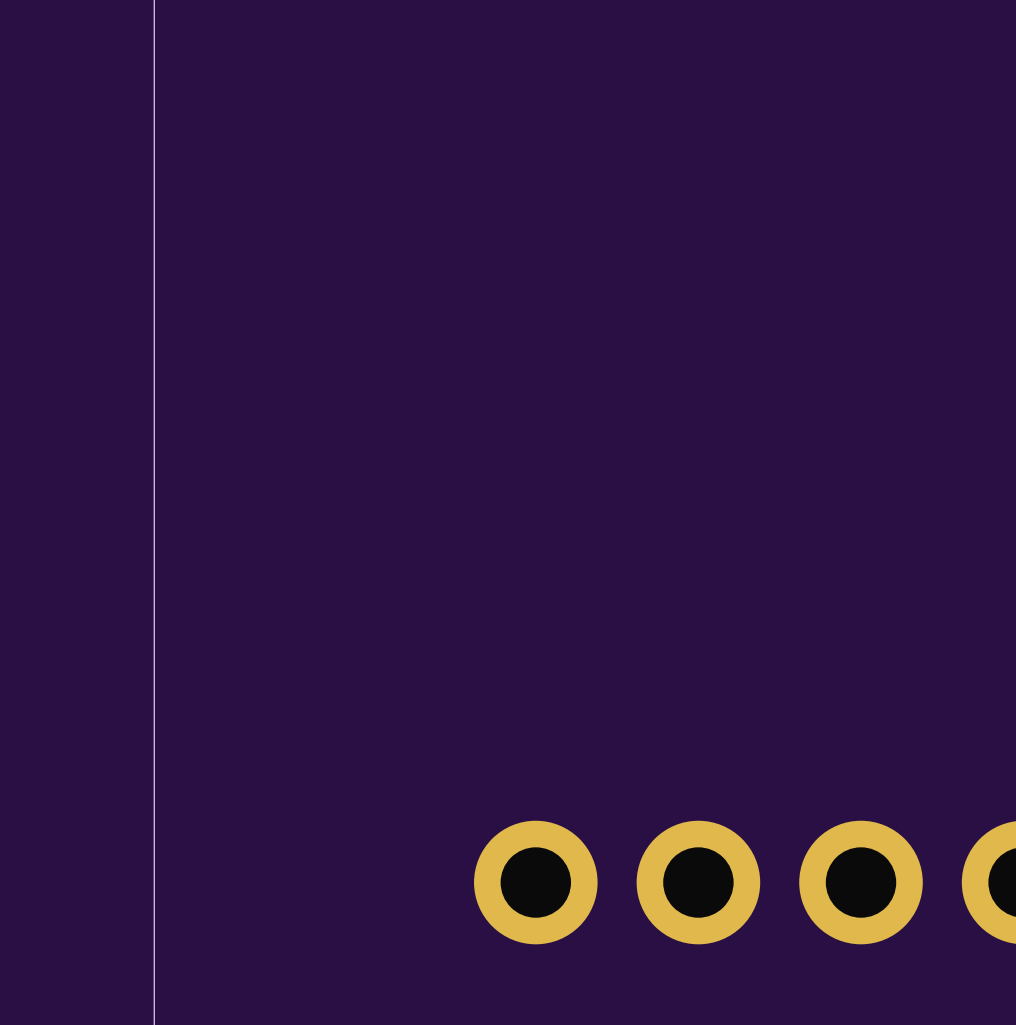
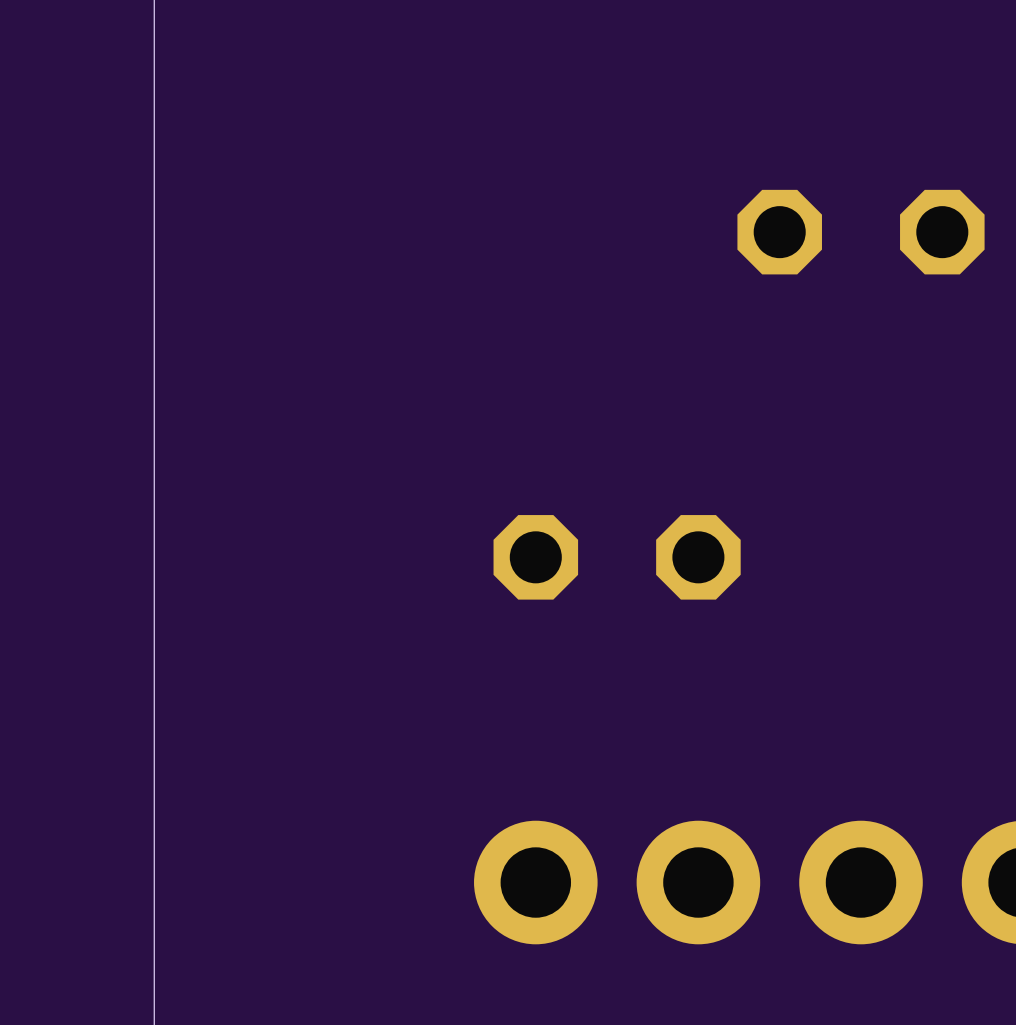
part: none -> (861, 232)
part: none -> (617, 557)

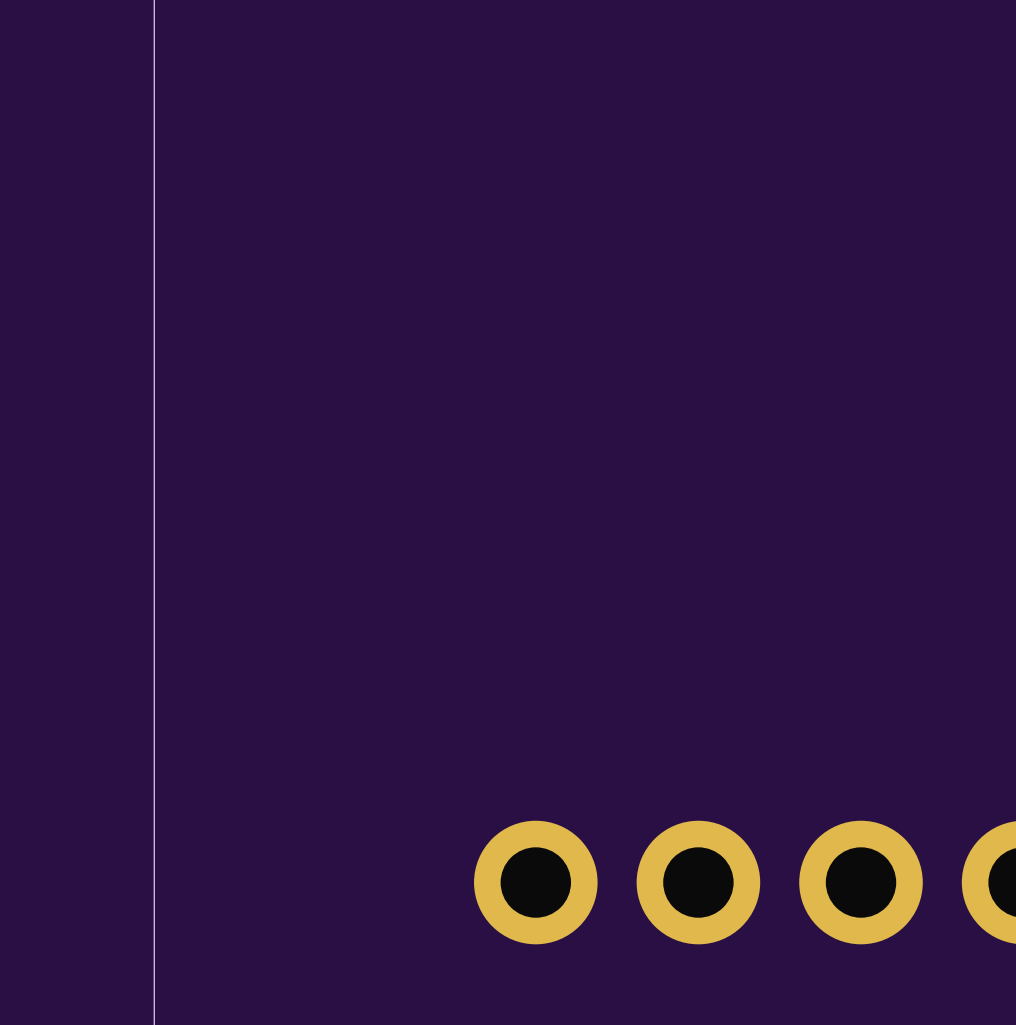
part: (861, 232) -> none
part: (617, 557) -> none

